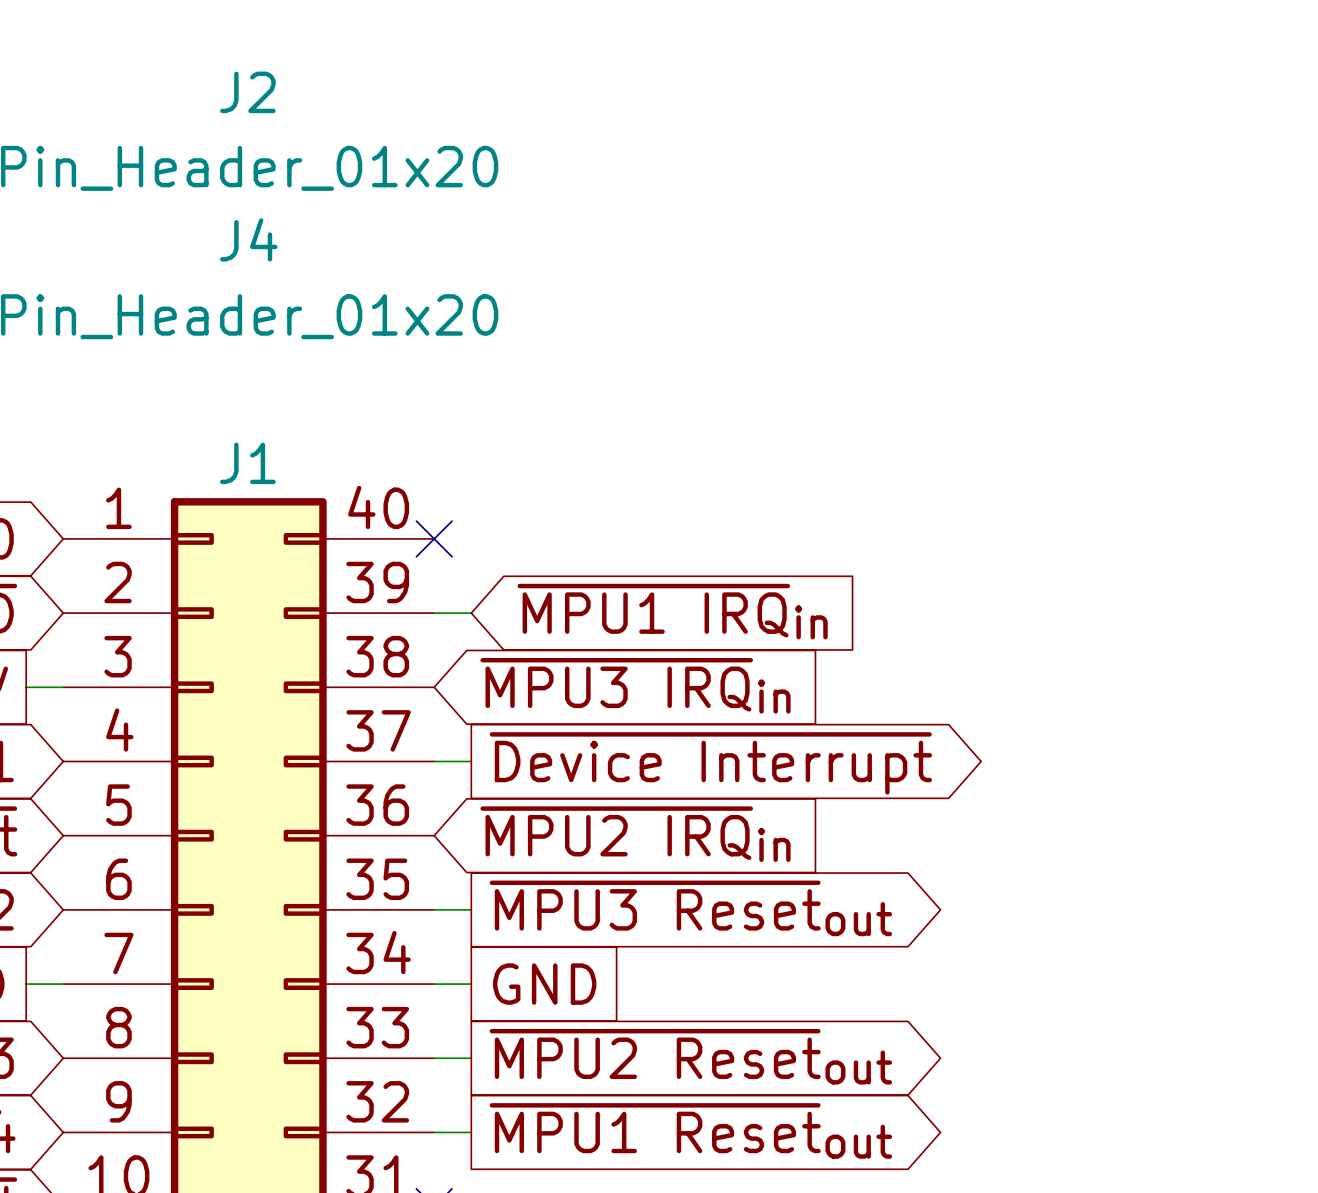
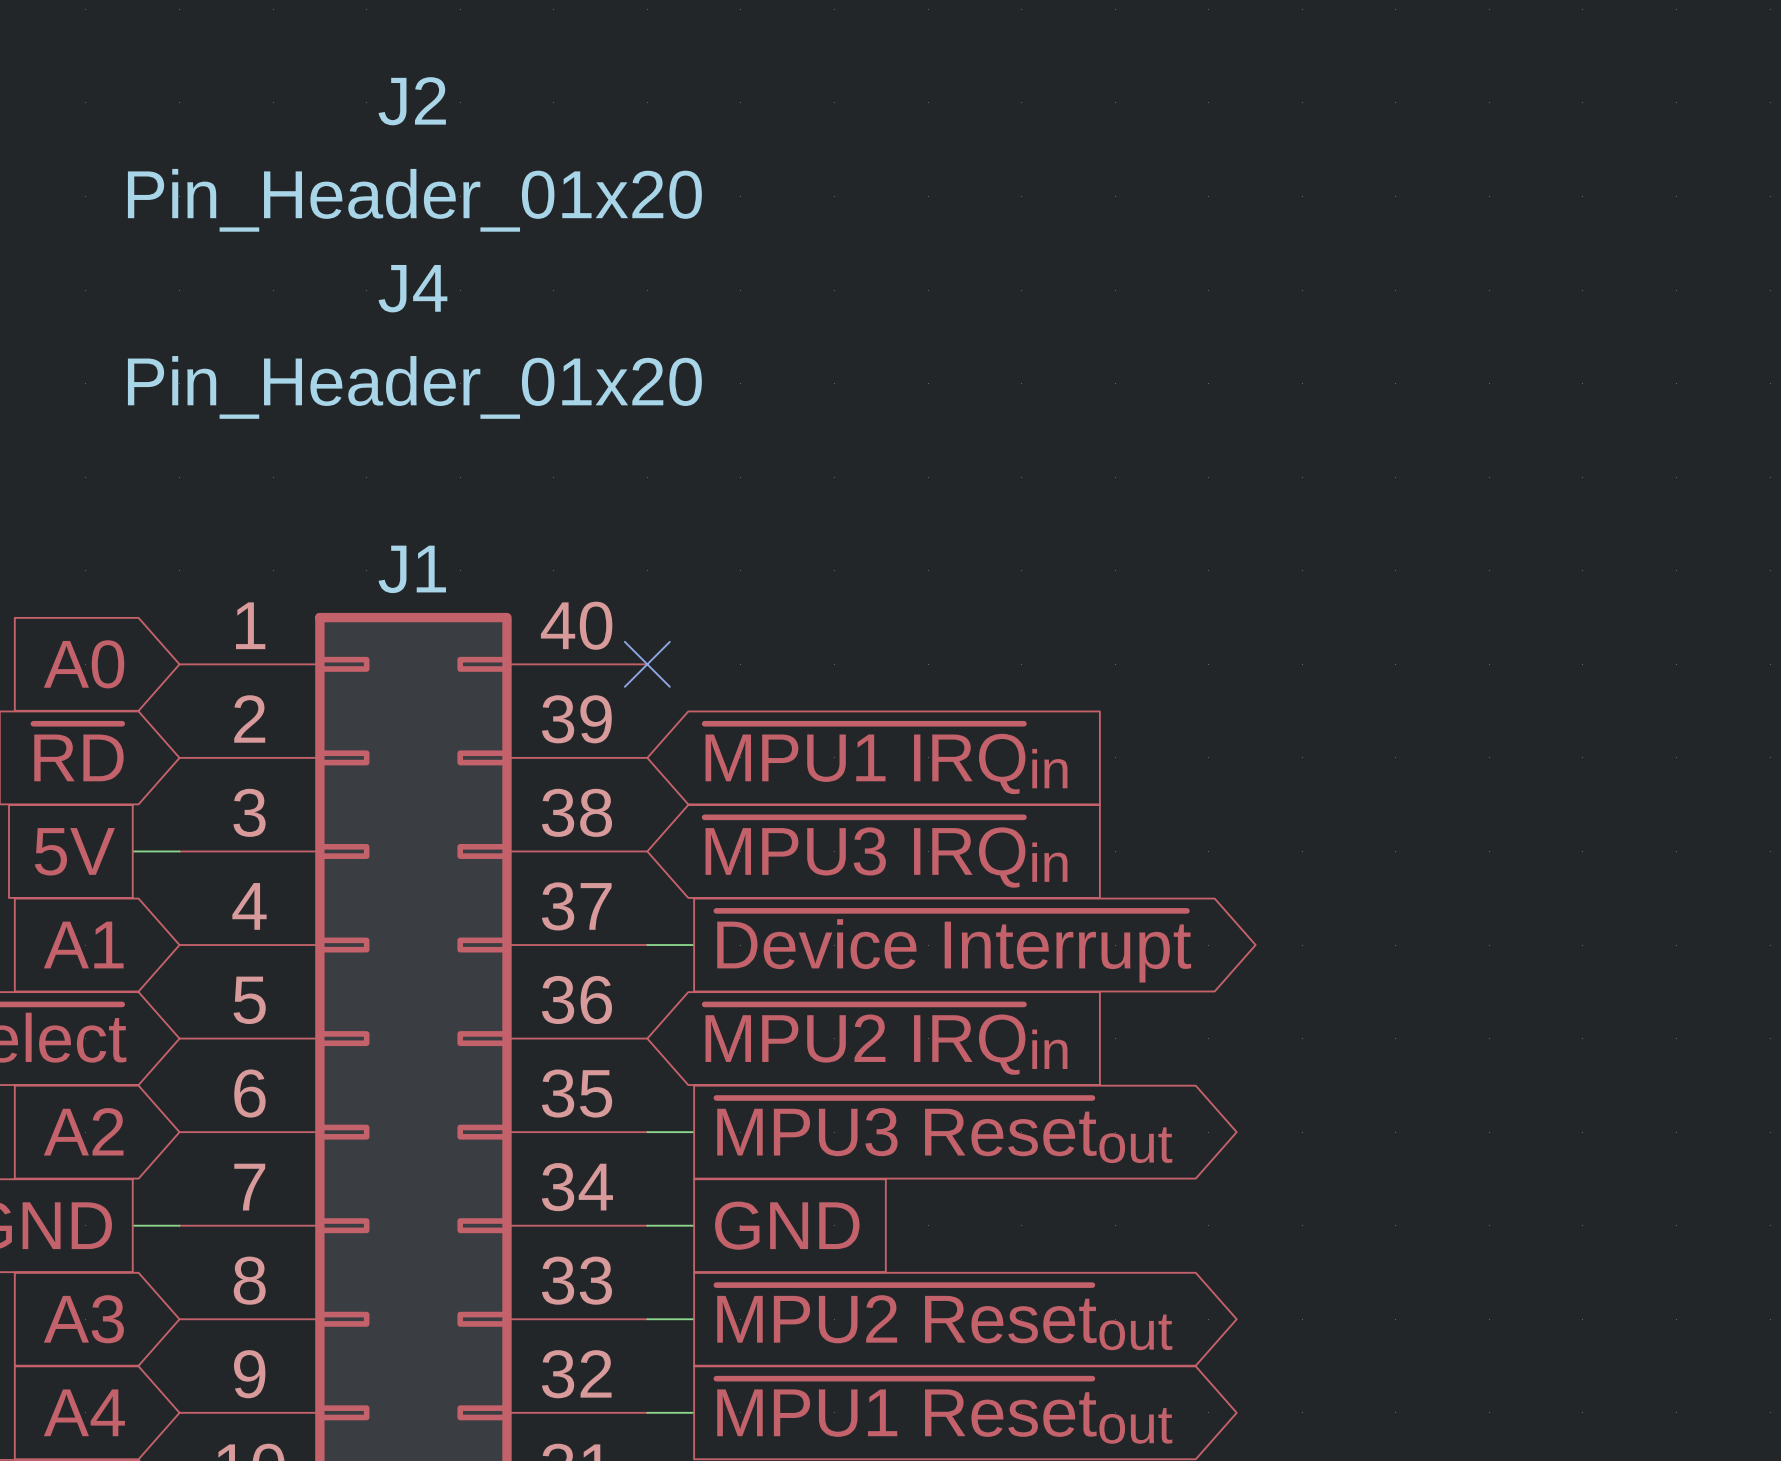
global label position: ~{MPU1 IRQ}in (672, 611) -> ~{MPU1 IRQ}in (886, 758)
wire: (434, 613) (471, 613) -> none

